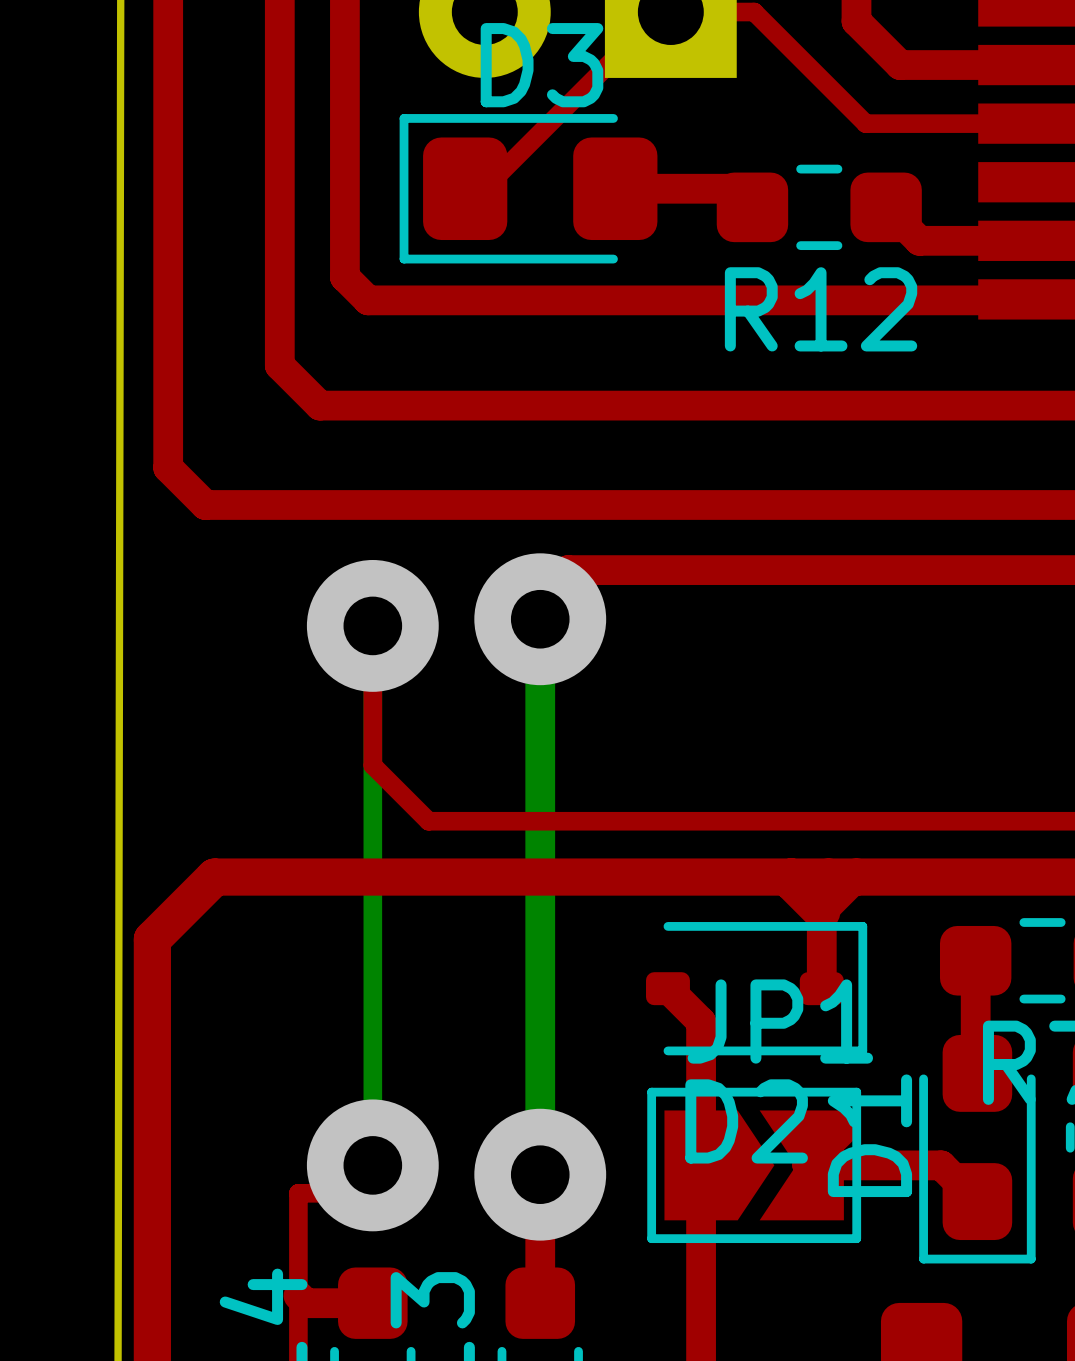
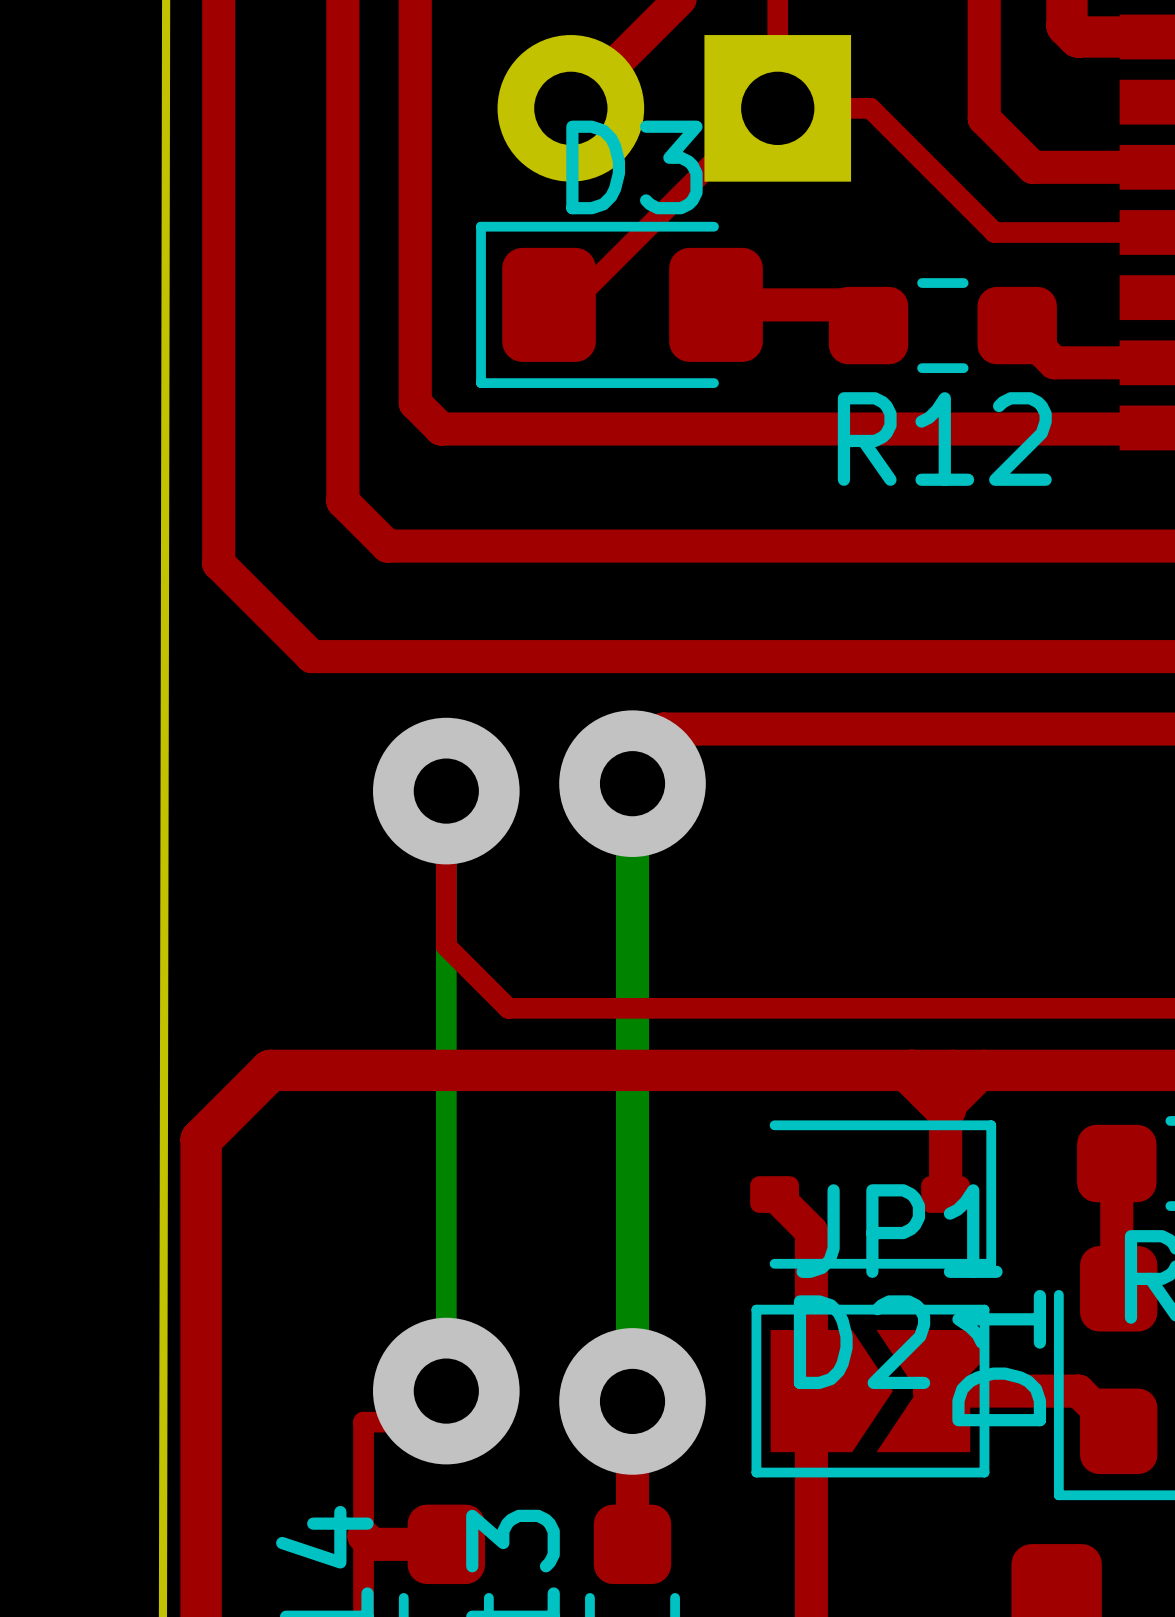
top track: (168, 421) (168, 467) (205, 504) (251, 504) -> (218, 563) (311, 656)

